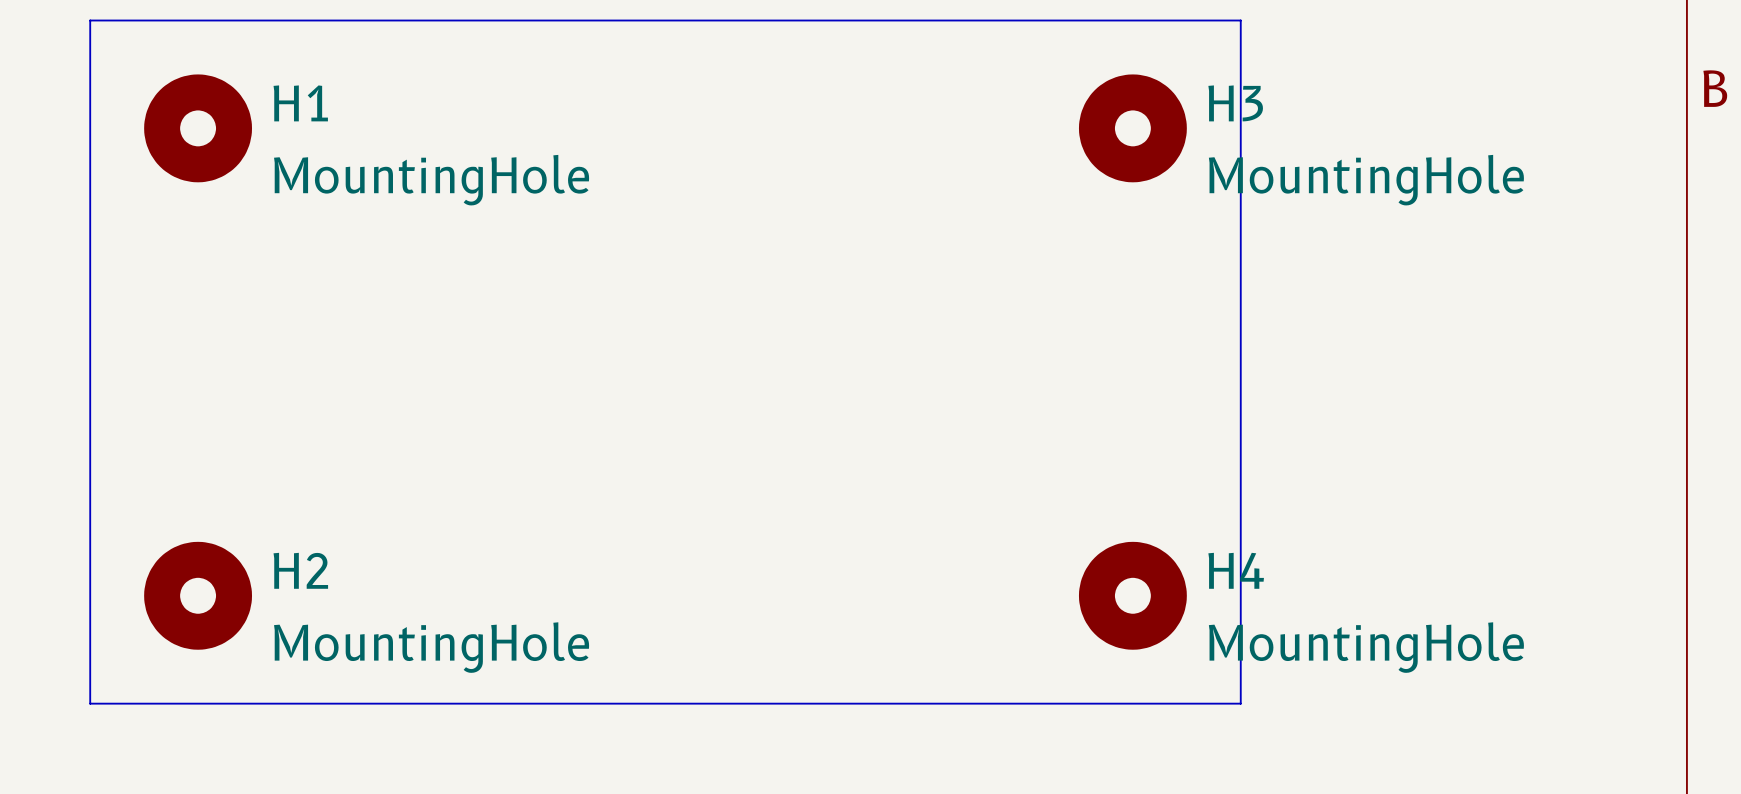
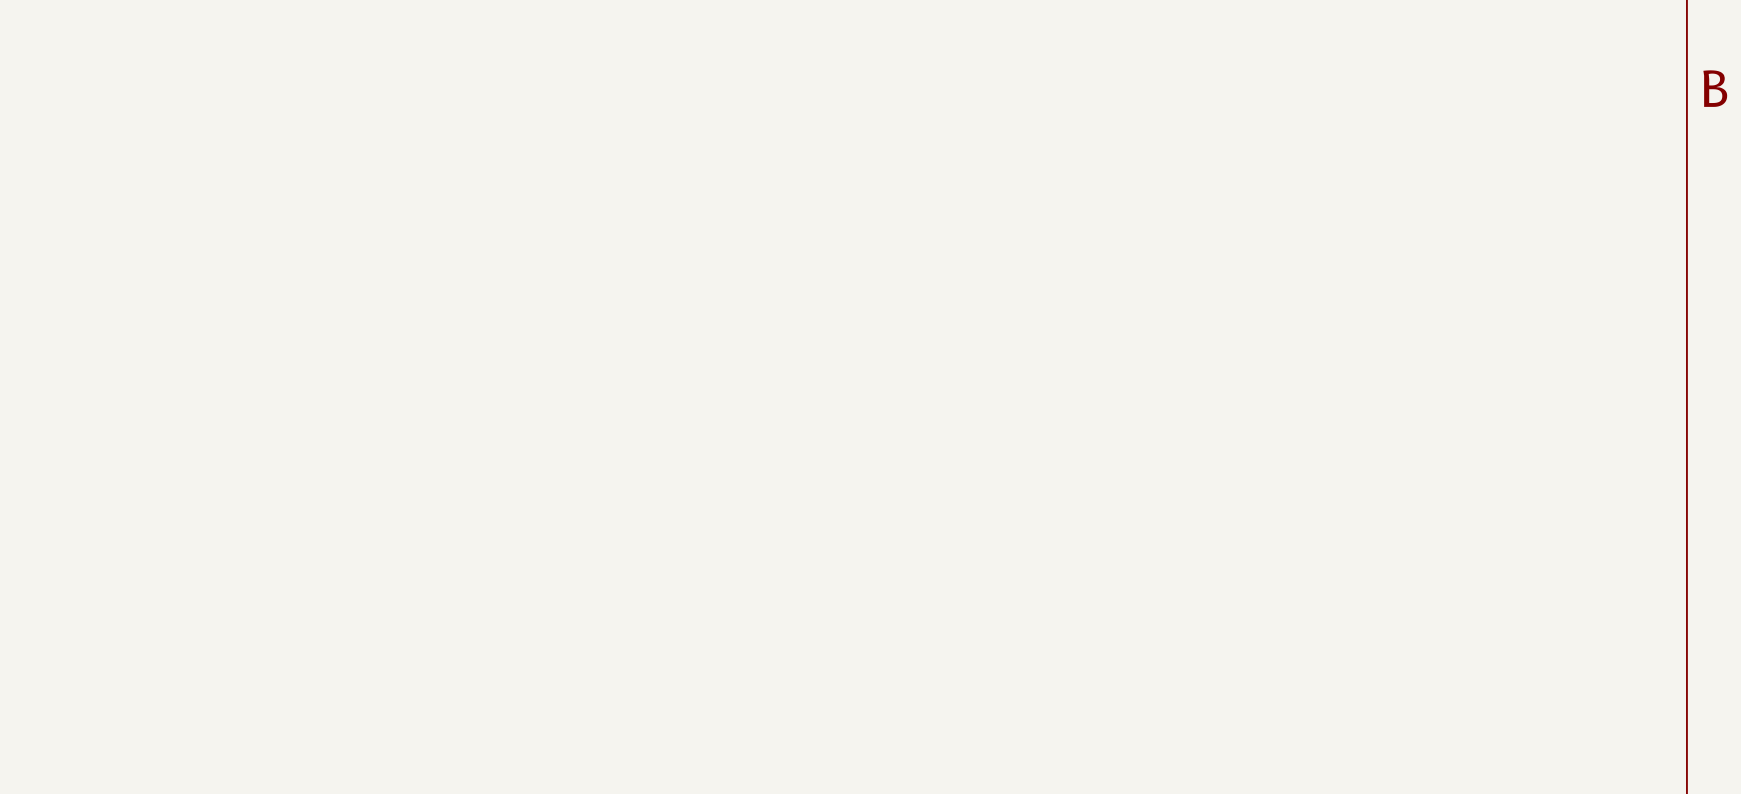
line: (90, 20) (90, 703) (1240, 703) (1240, 20) (90, 20) -> none
H1: MountingHole (198, 128) -> none
H3: MountingHole (1132, 128) -> none
H2: MountingHole (198, 595) -> none
H4: MountingHole (1132, 595) -> none

